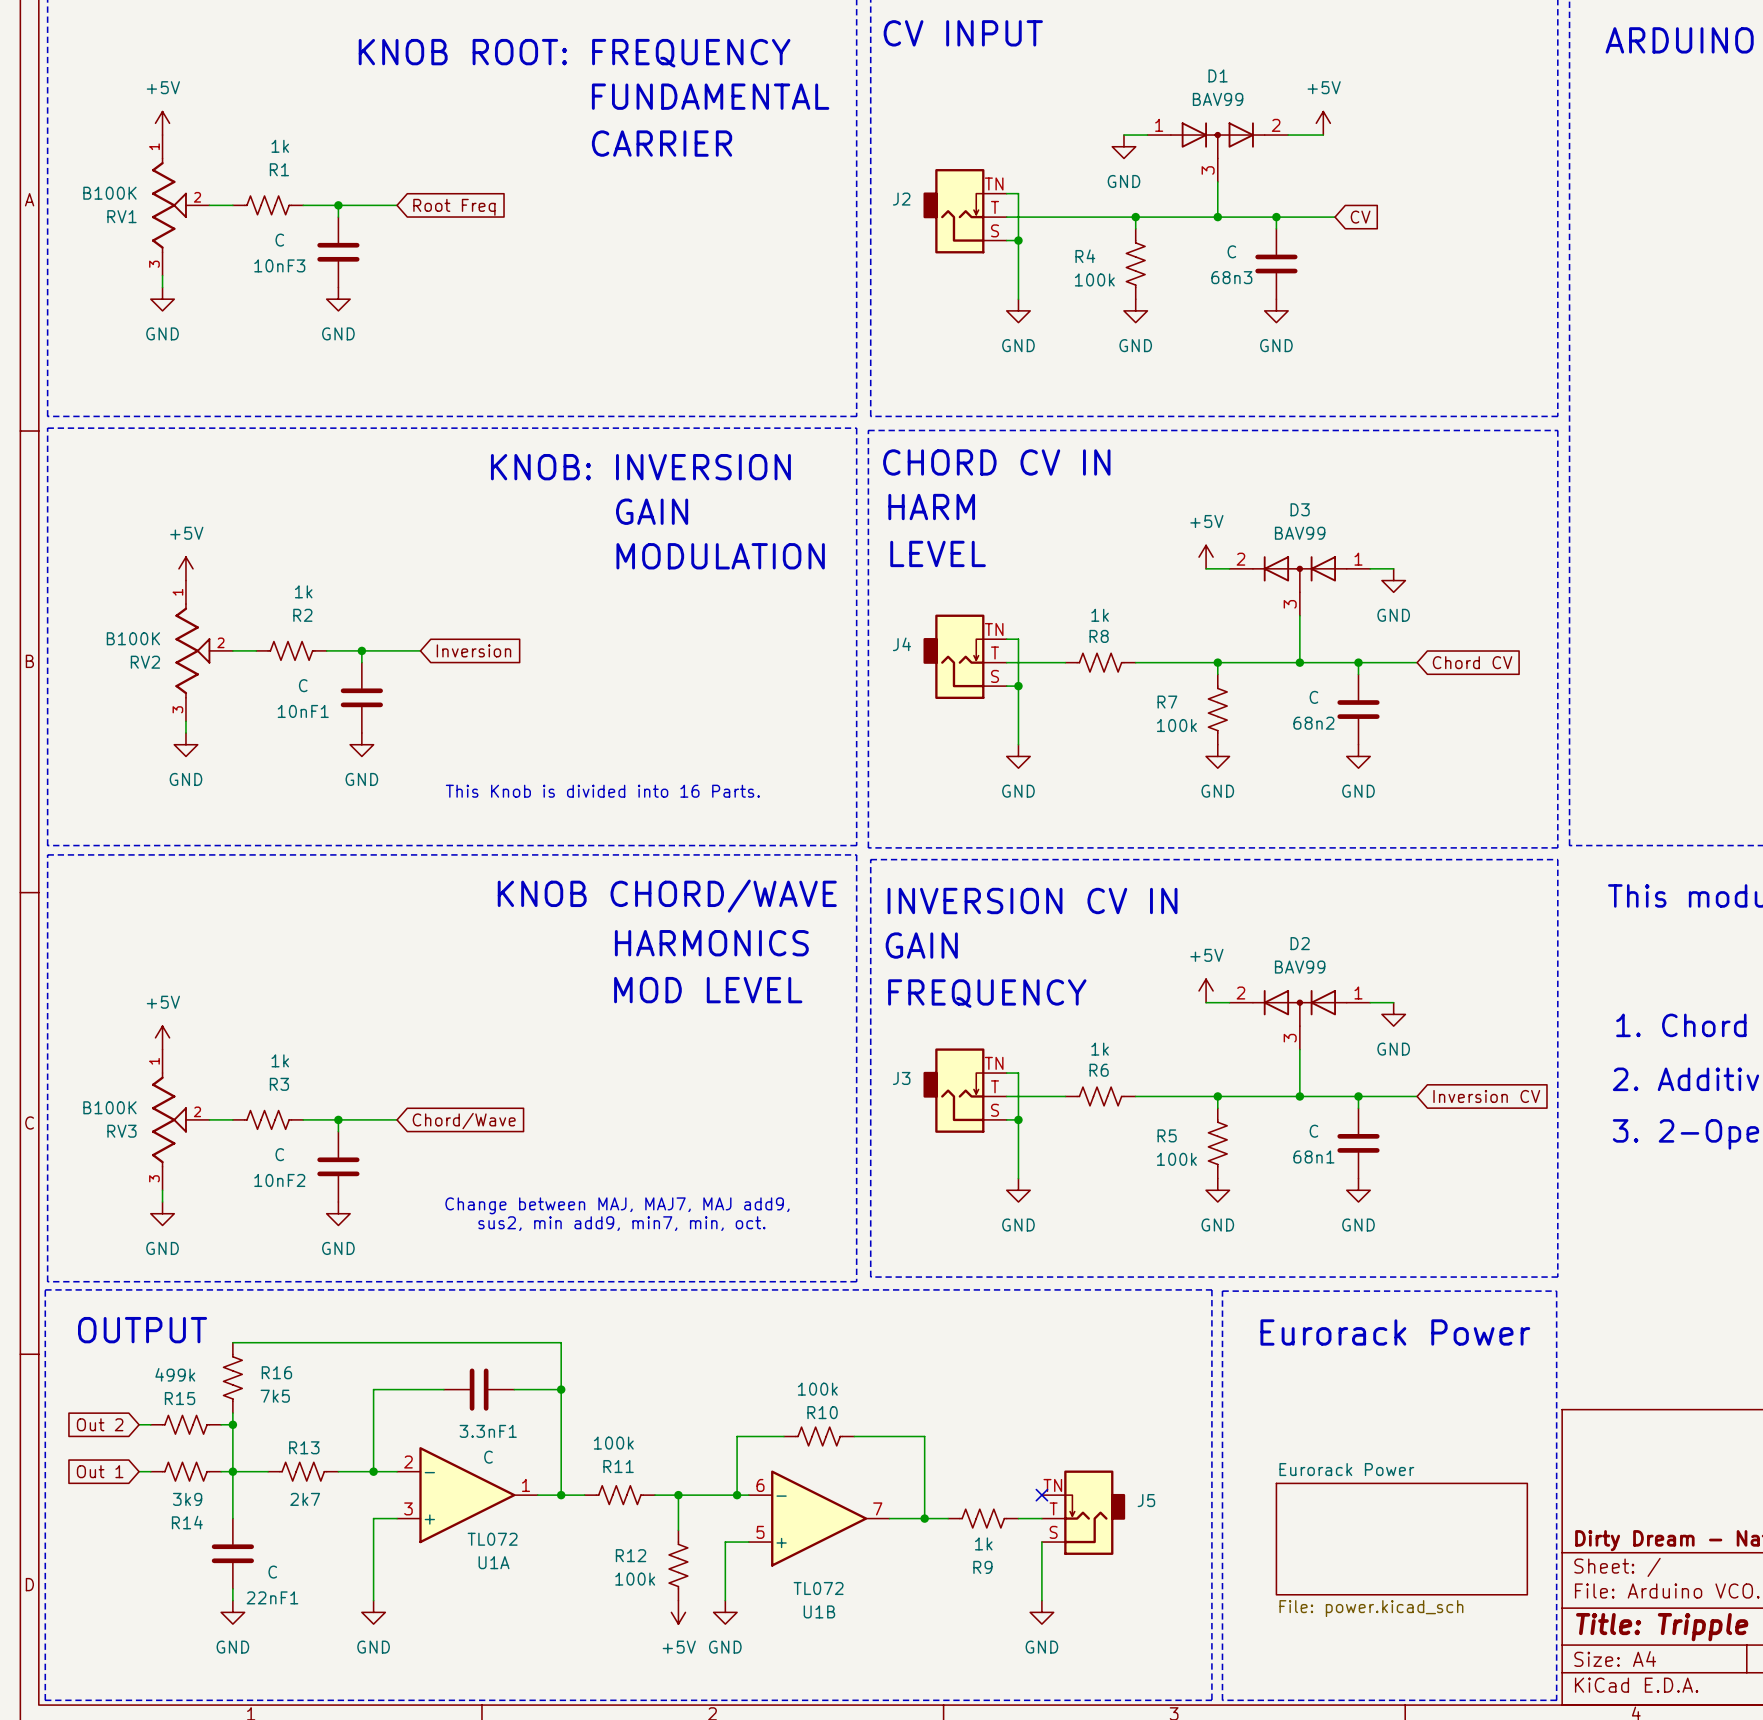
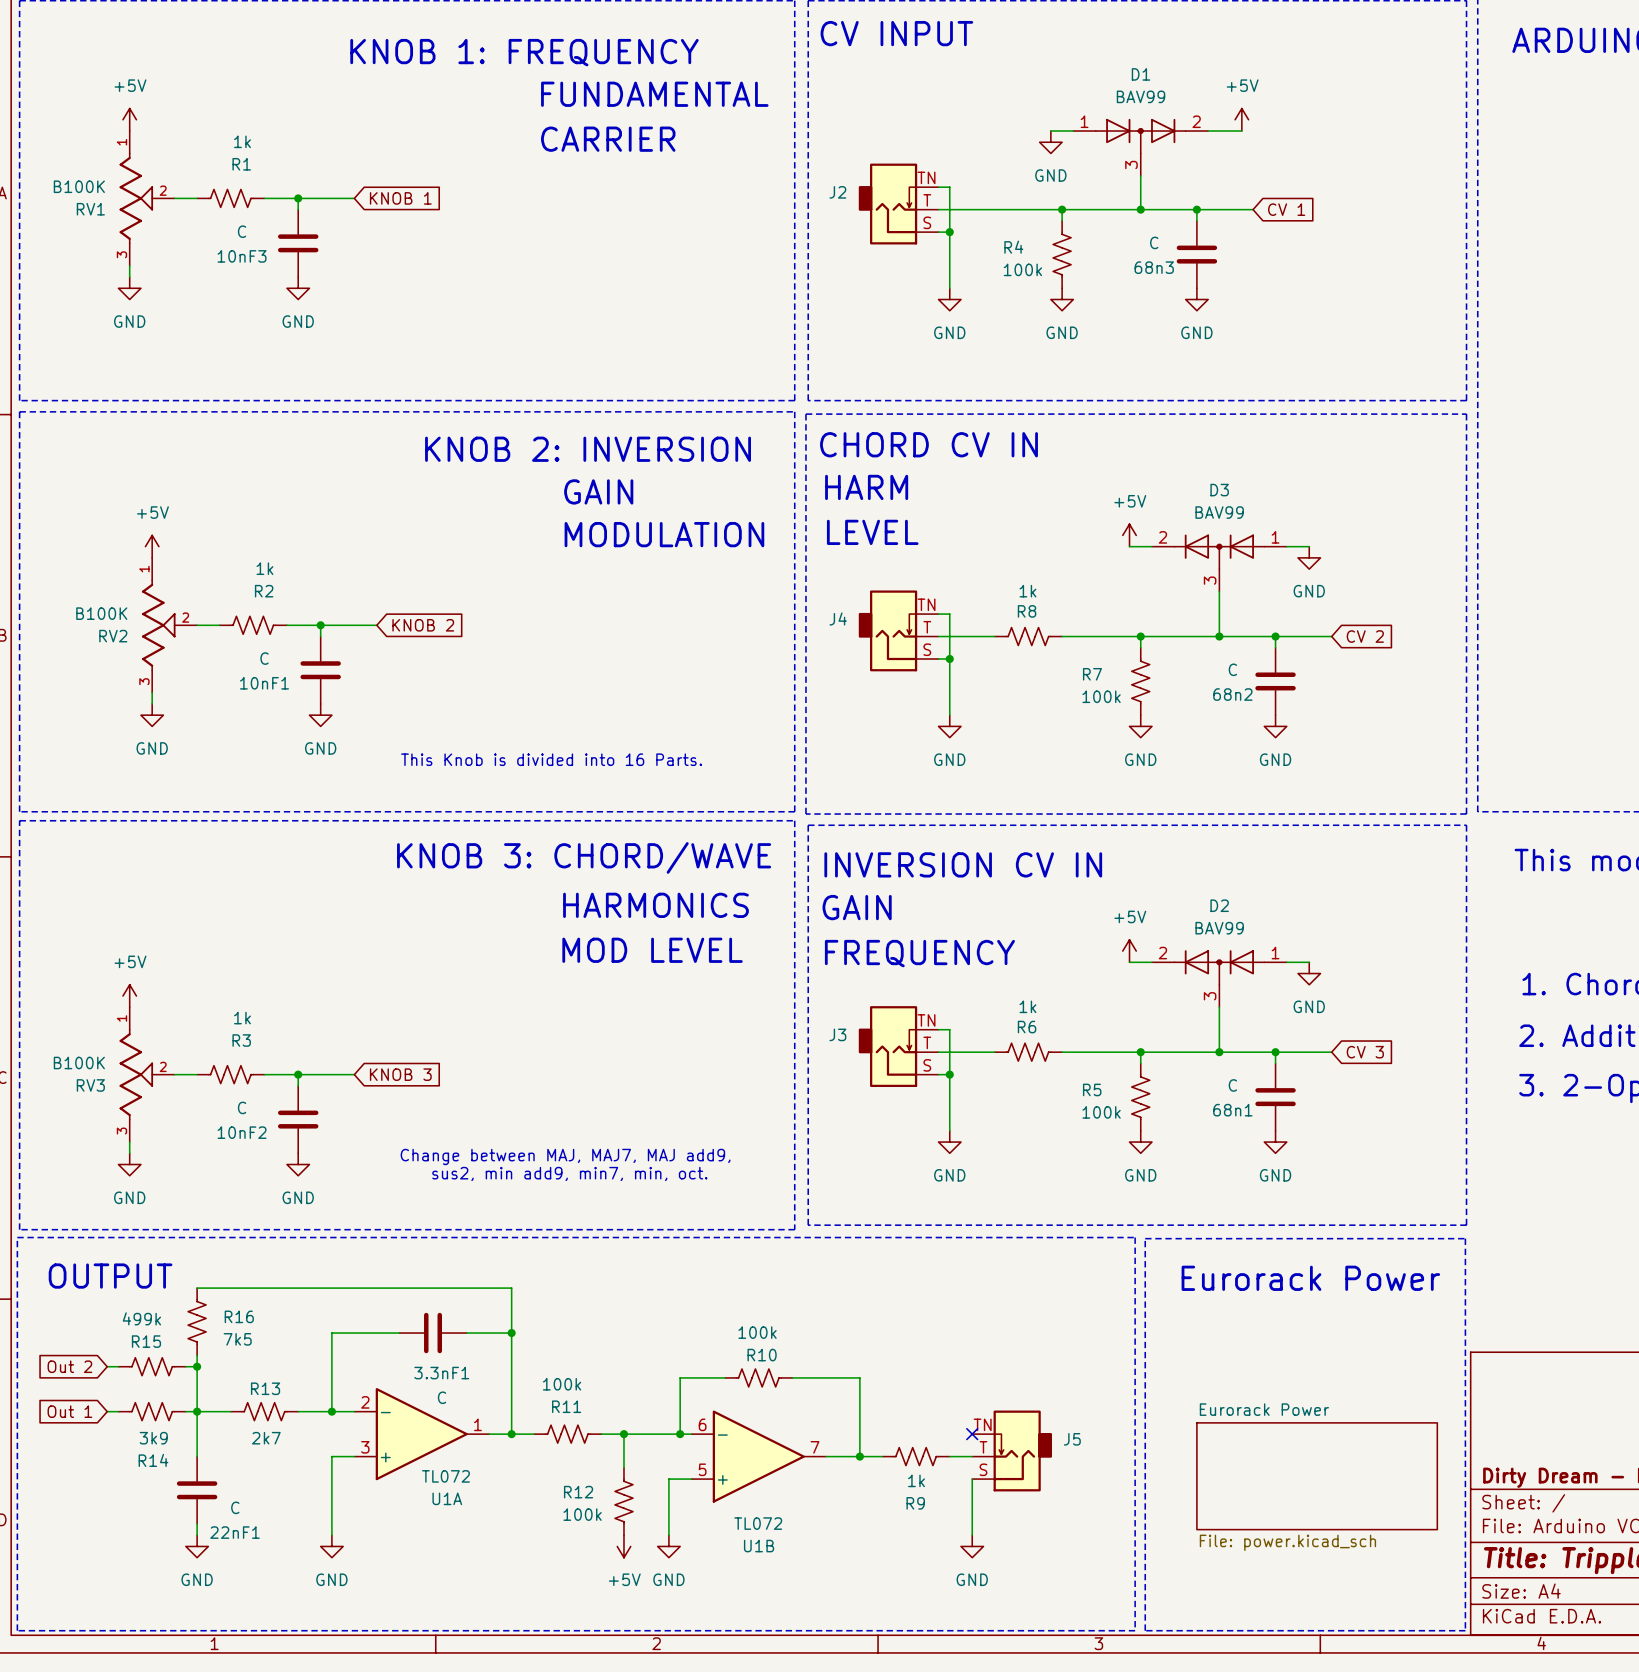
text: KNOB ROOT: FREQUENCY (574, 53) -> KNOB 1: FREQUENCY (524, 52)
global label: Root Freq (454, 207) -> KNOB 1 (400, 198)
global label: CV (1360, 217) -> CV 1 (1286, 209)
text: KNOB: INVERSION (640, 467) -> KNOB 2: INVERSION (588, 449)
global label: Inversion (473, 650) -> KNOB 2 (423, 625)
global label: Chord CV (1472, 662) -> CV 2 (1365, 636)
text: KNOB CHORD/WAVE (667, 896) -> KNOB 3: CHORD/WAVE (584, 857)
global label: Inversion CV (1486, 1096) -> CV 3 (1365, 1052)
global label: Chord/Wave (464, 1121) -> KNOB 3 (400, 1074)

